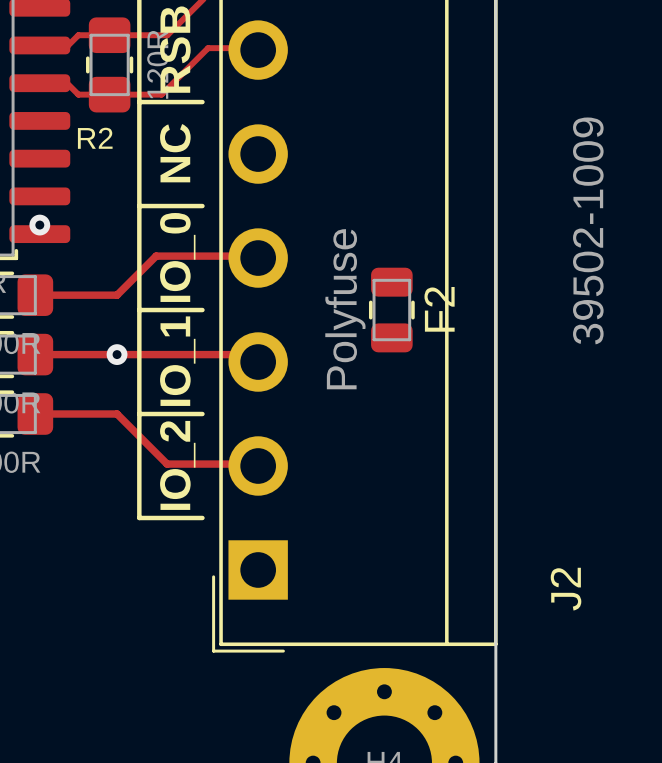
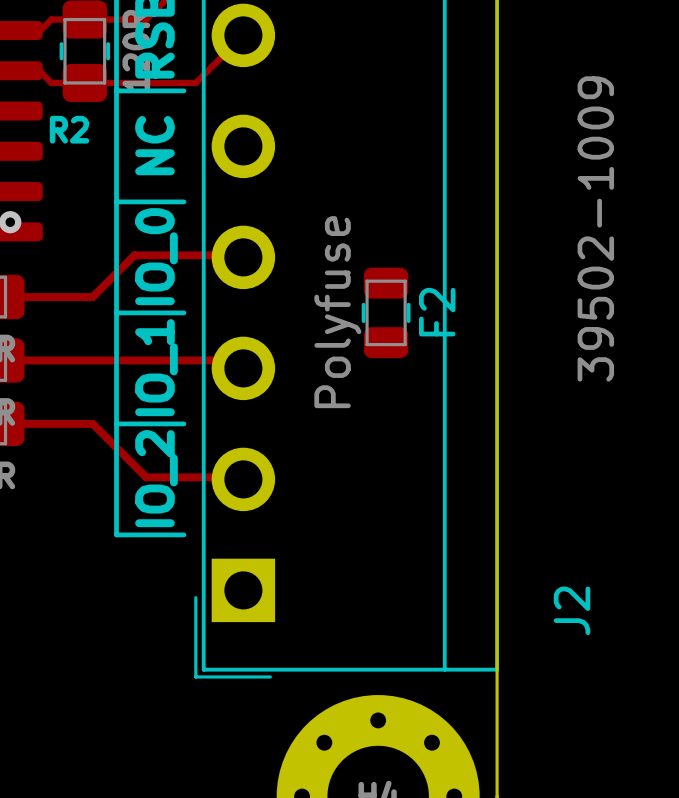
track: (258, 48) (208, 48) (161, 94) -> (243, 35) (195, 82) (140, 82)
via: (117, 354) -> none

